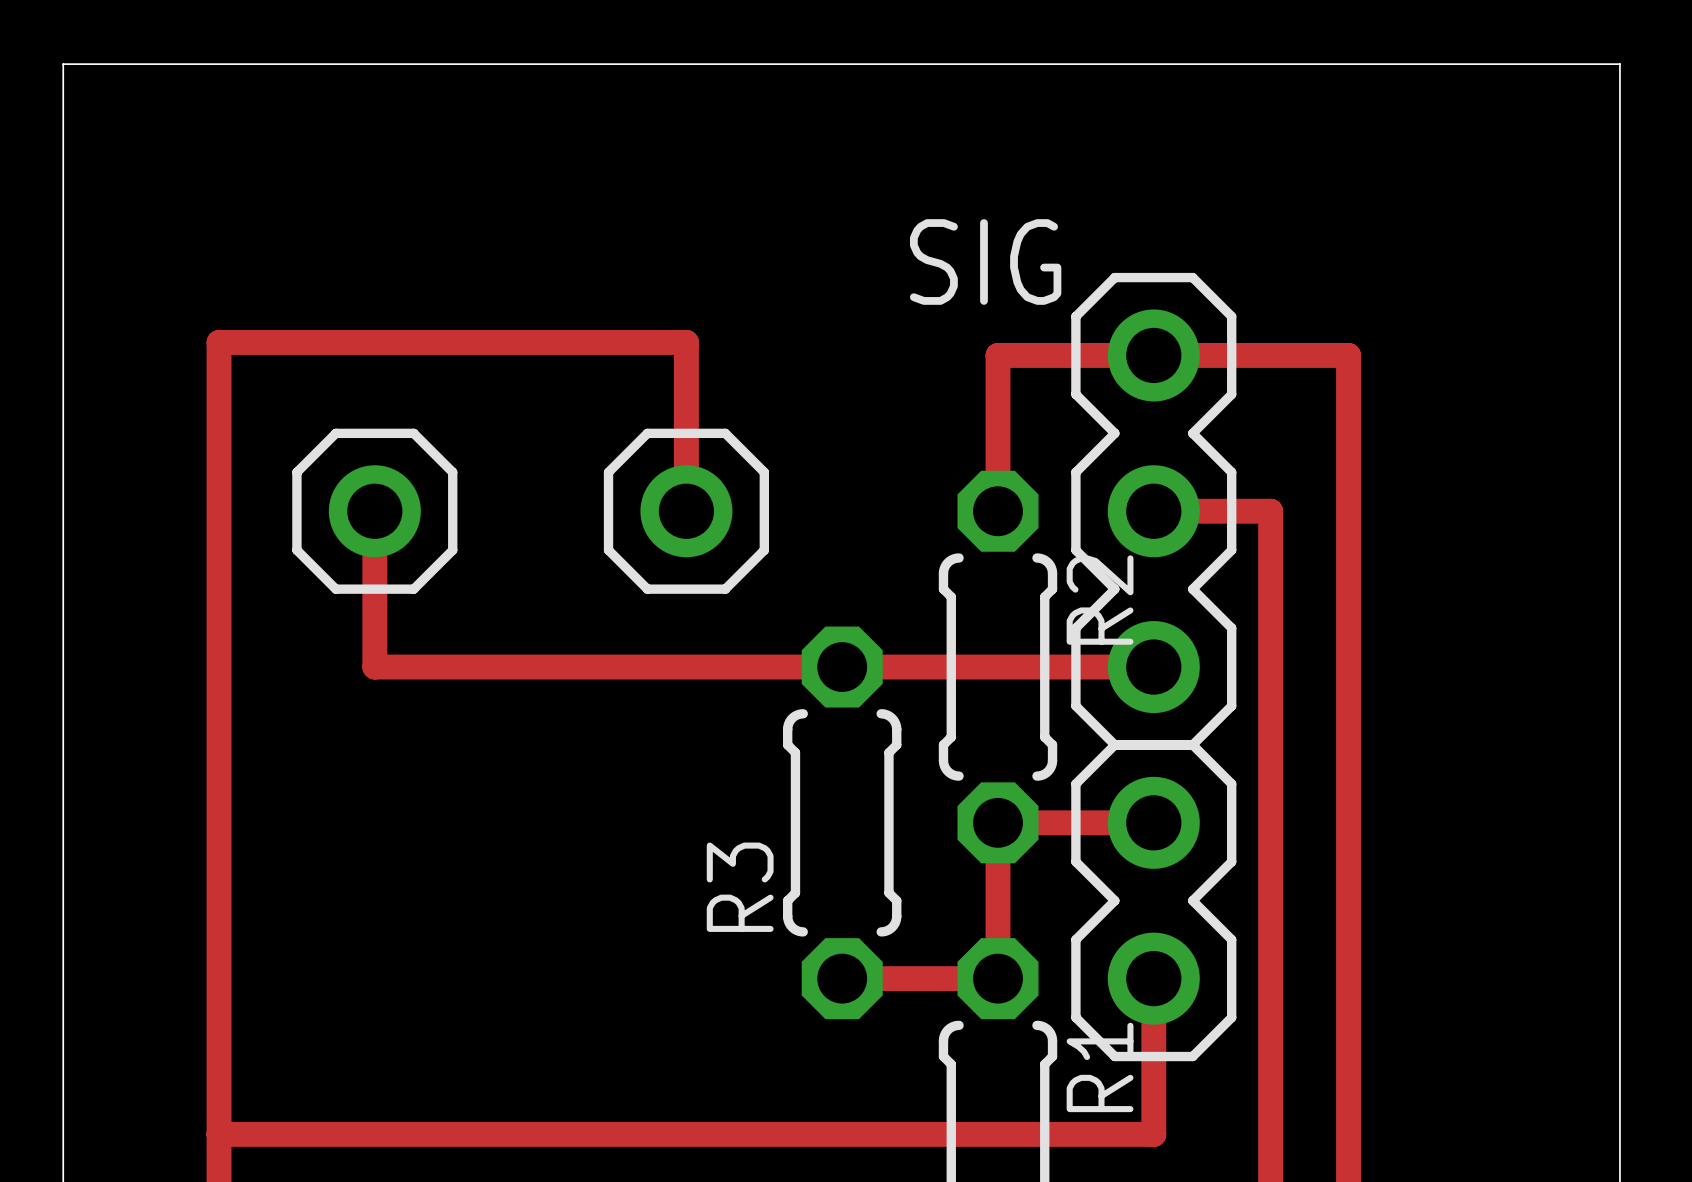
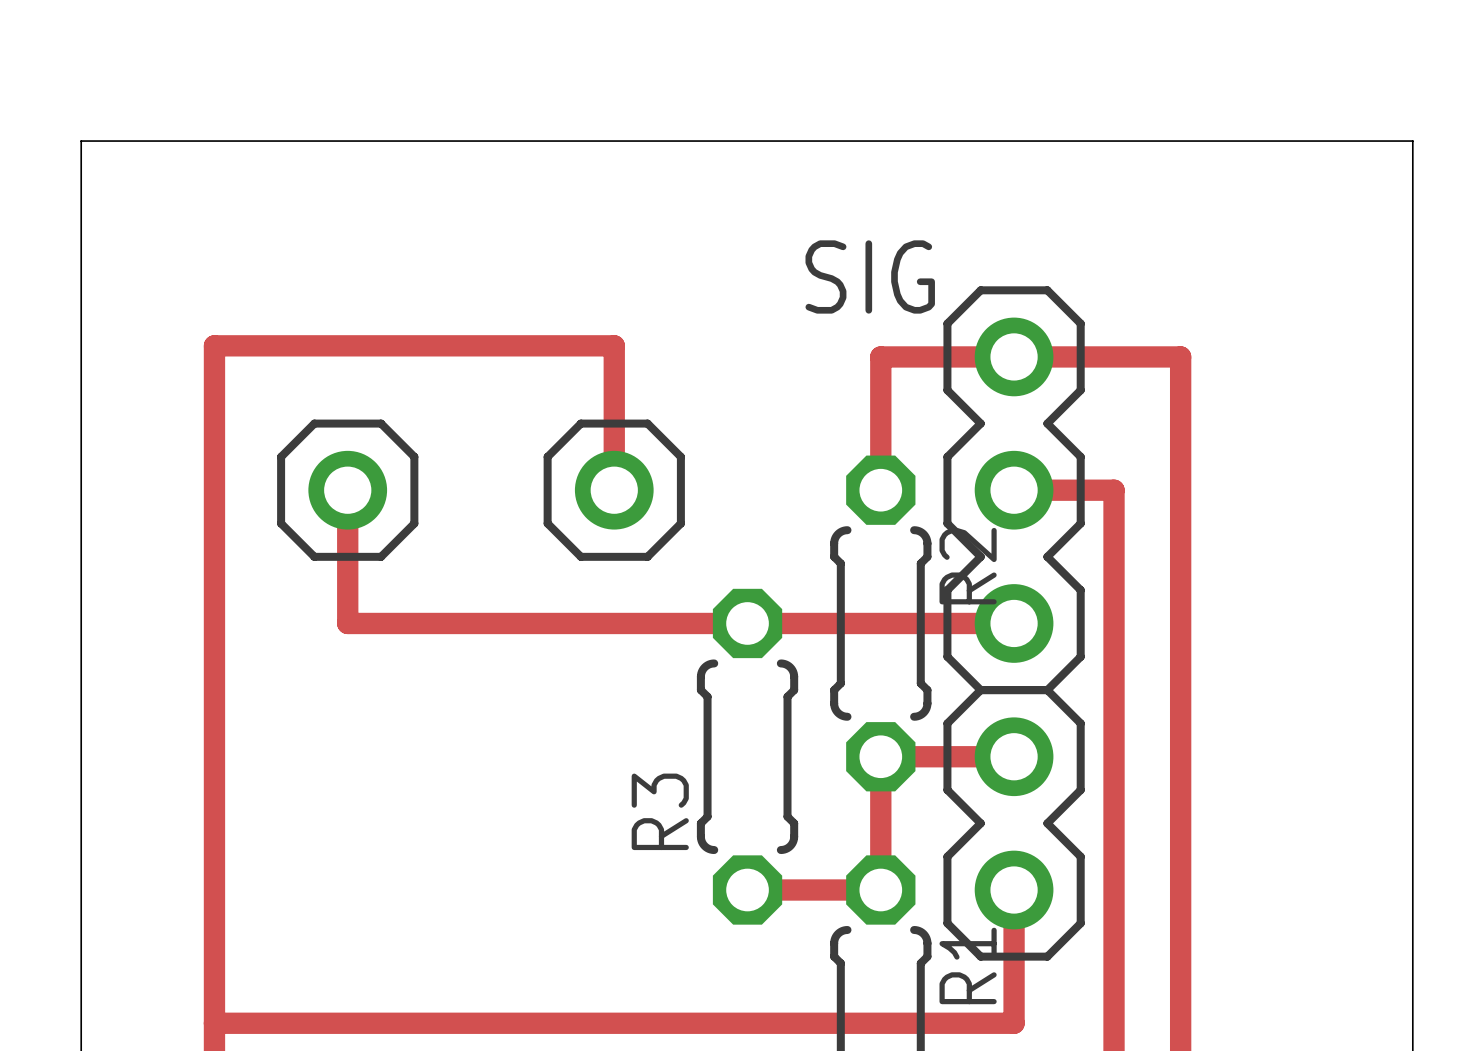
board edge: (63, 103) (63, 64) (1619, 64) (1619, 103) -> (81, 141) (1412, 141)

